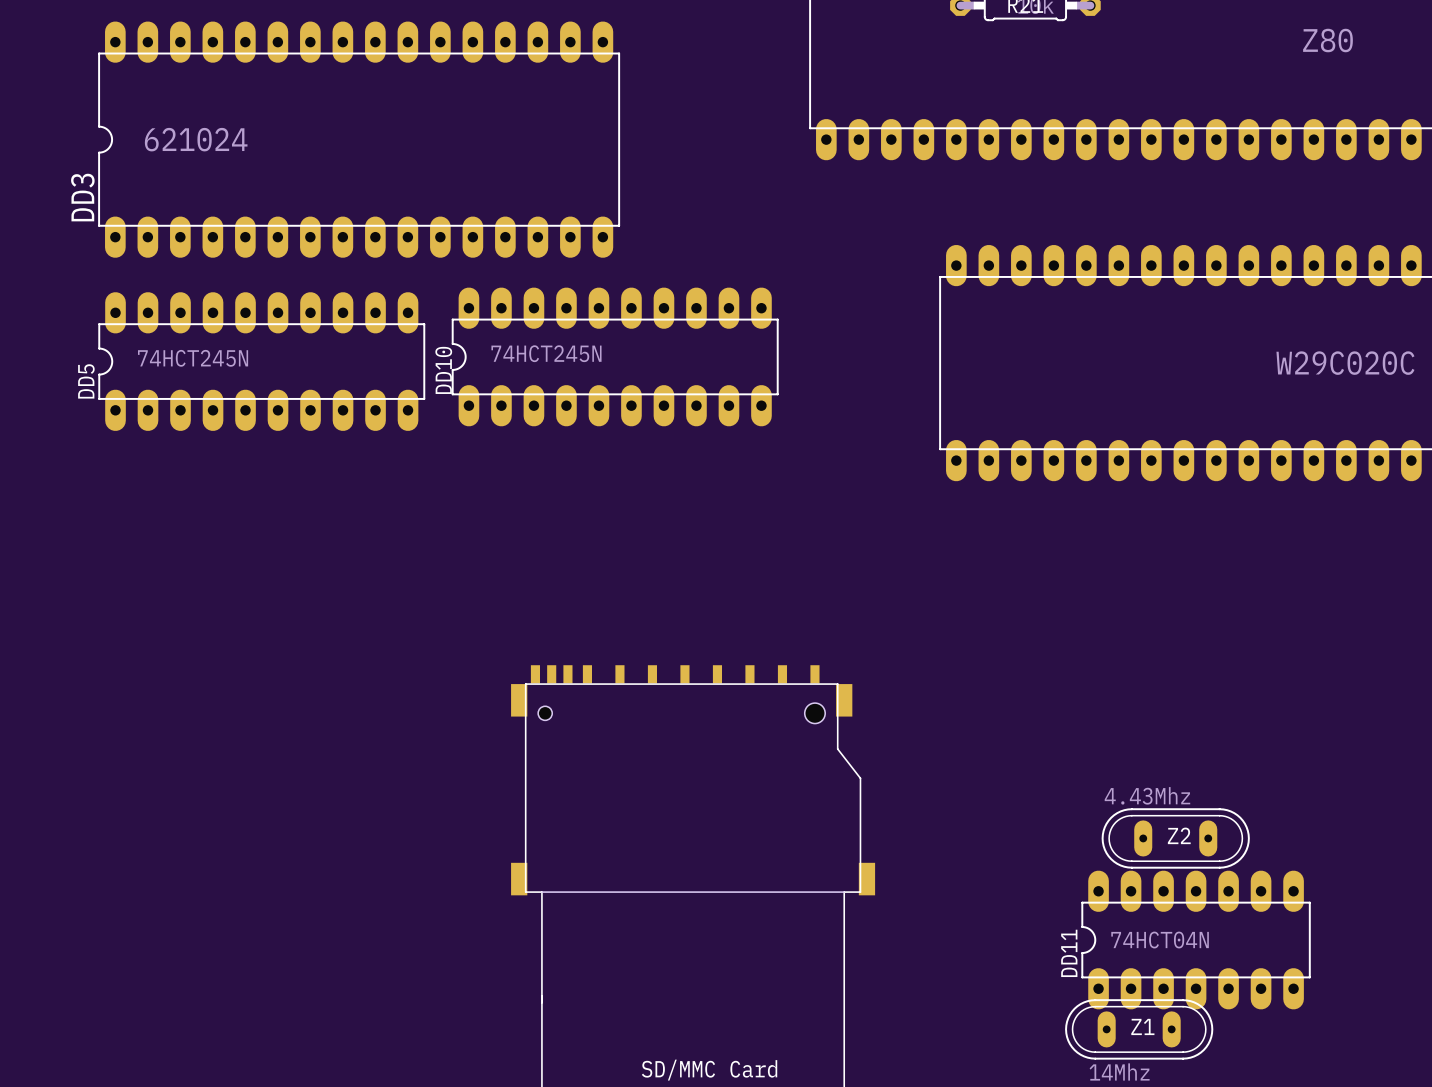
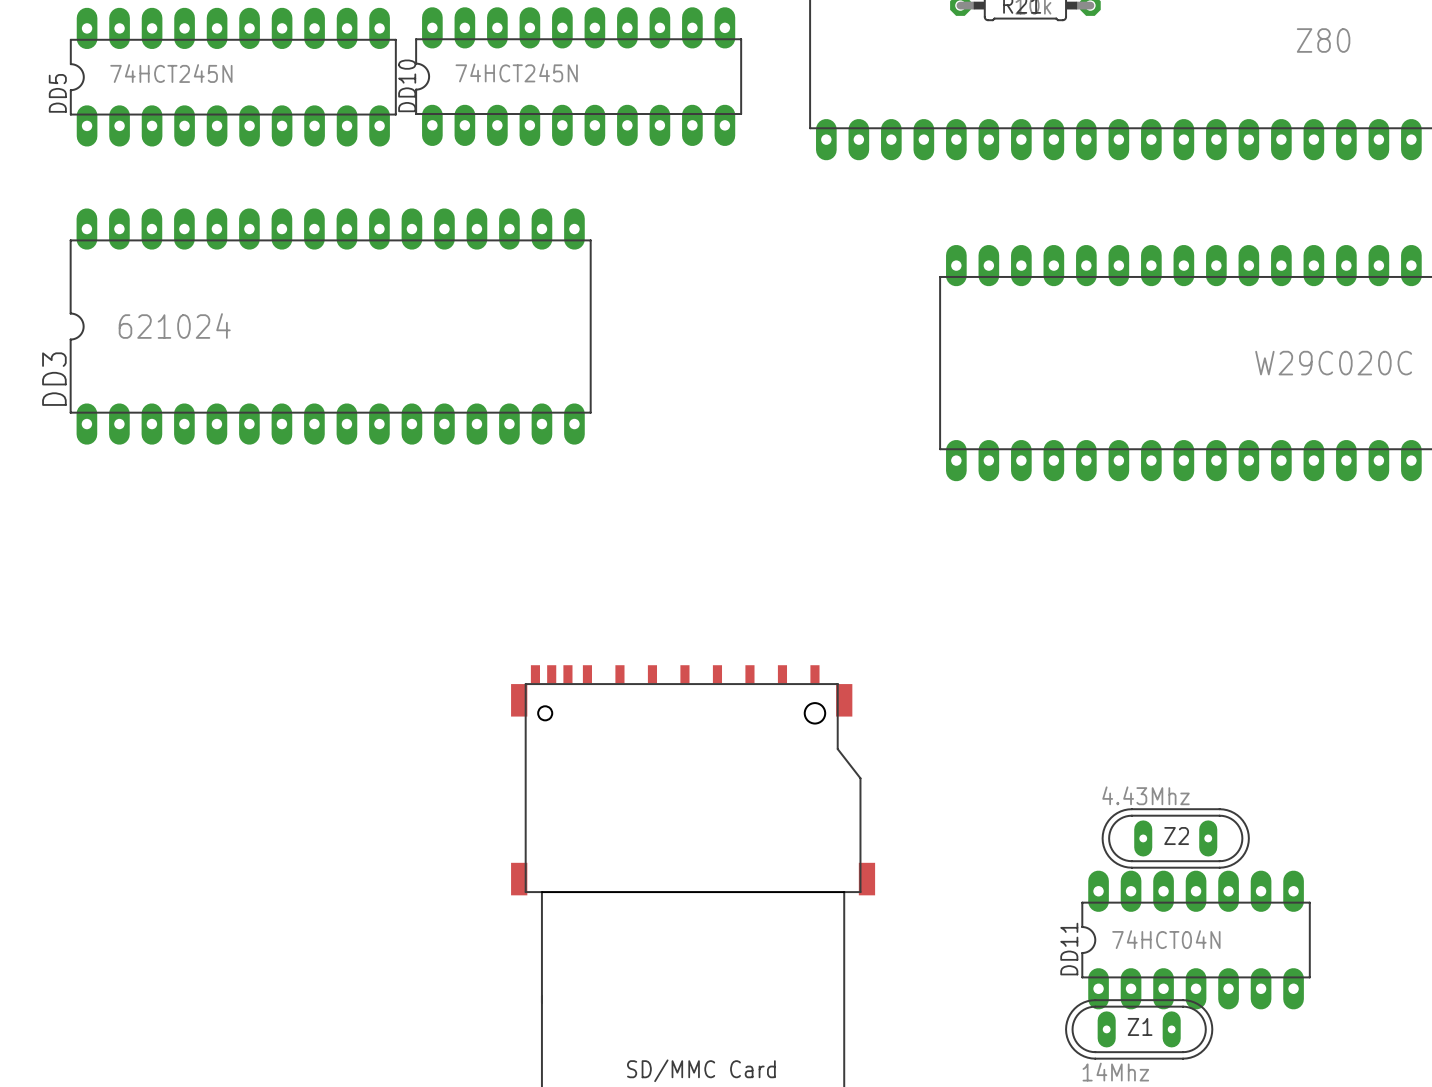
DD3 position: (359, 139) -> (330, 326)
DD10 position: (615, 356) -> (578, 76)
DD5 position: (261, 361) -> (233, 77)

